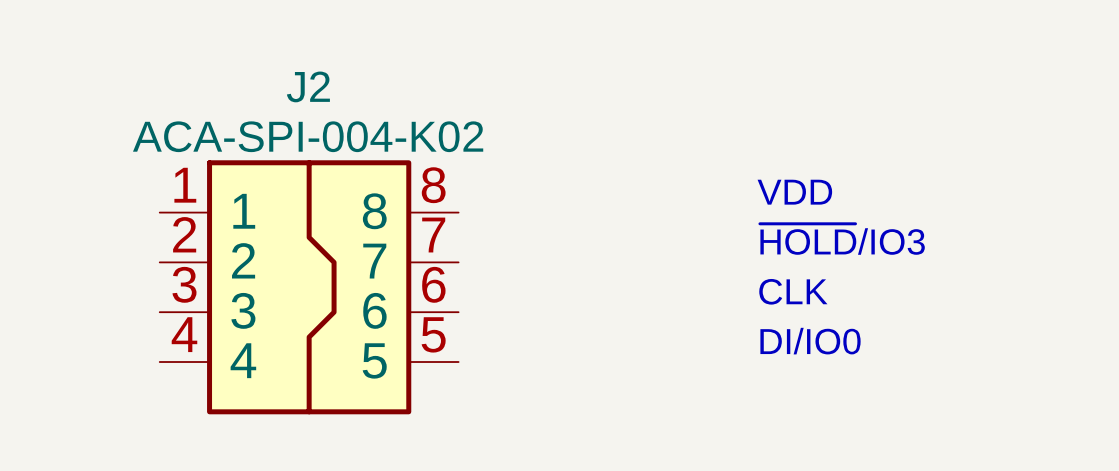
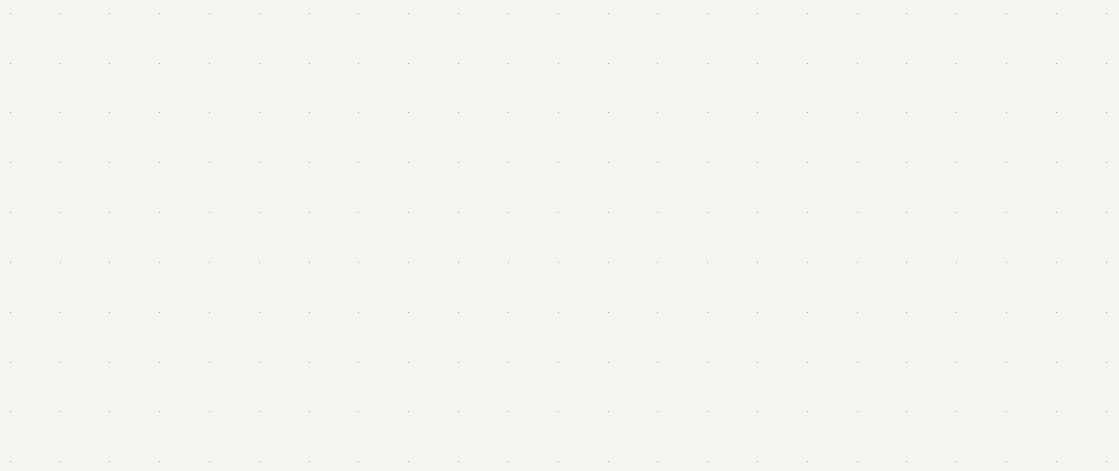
text: VDD (794, 192) -> none
text: ~{HOLD}/IO3 (842, 239) -> none
J2: ACA-SPI-004-K02 (309, 287) -> none
text: CLK (793, 291) -> none
text: DI/IO0 (810, 341) -> none

